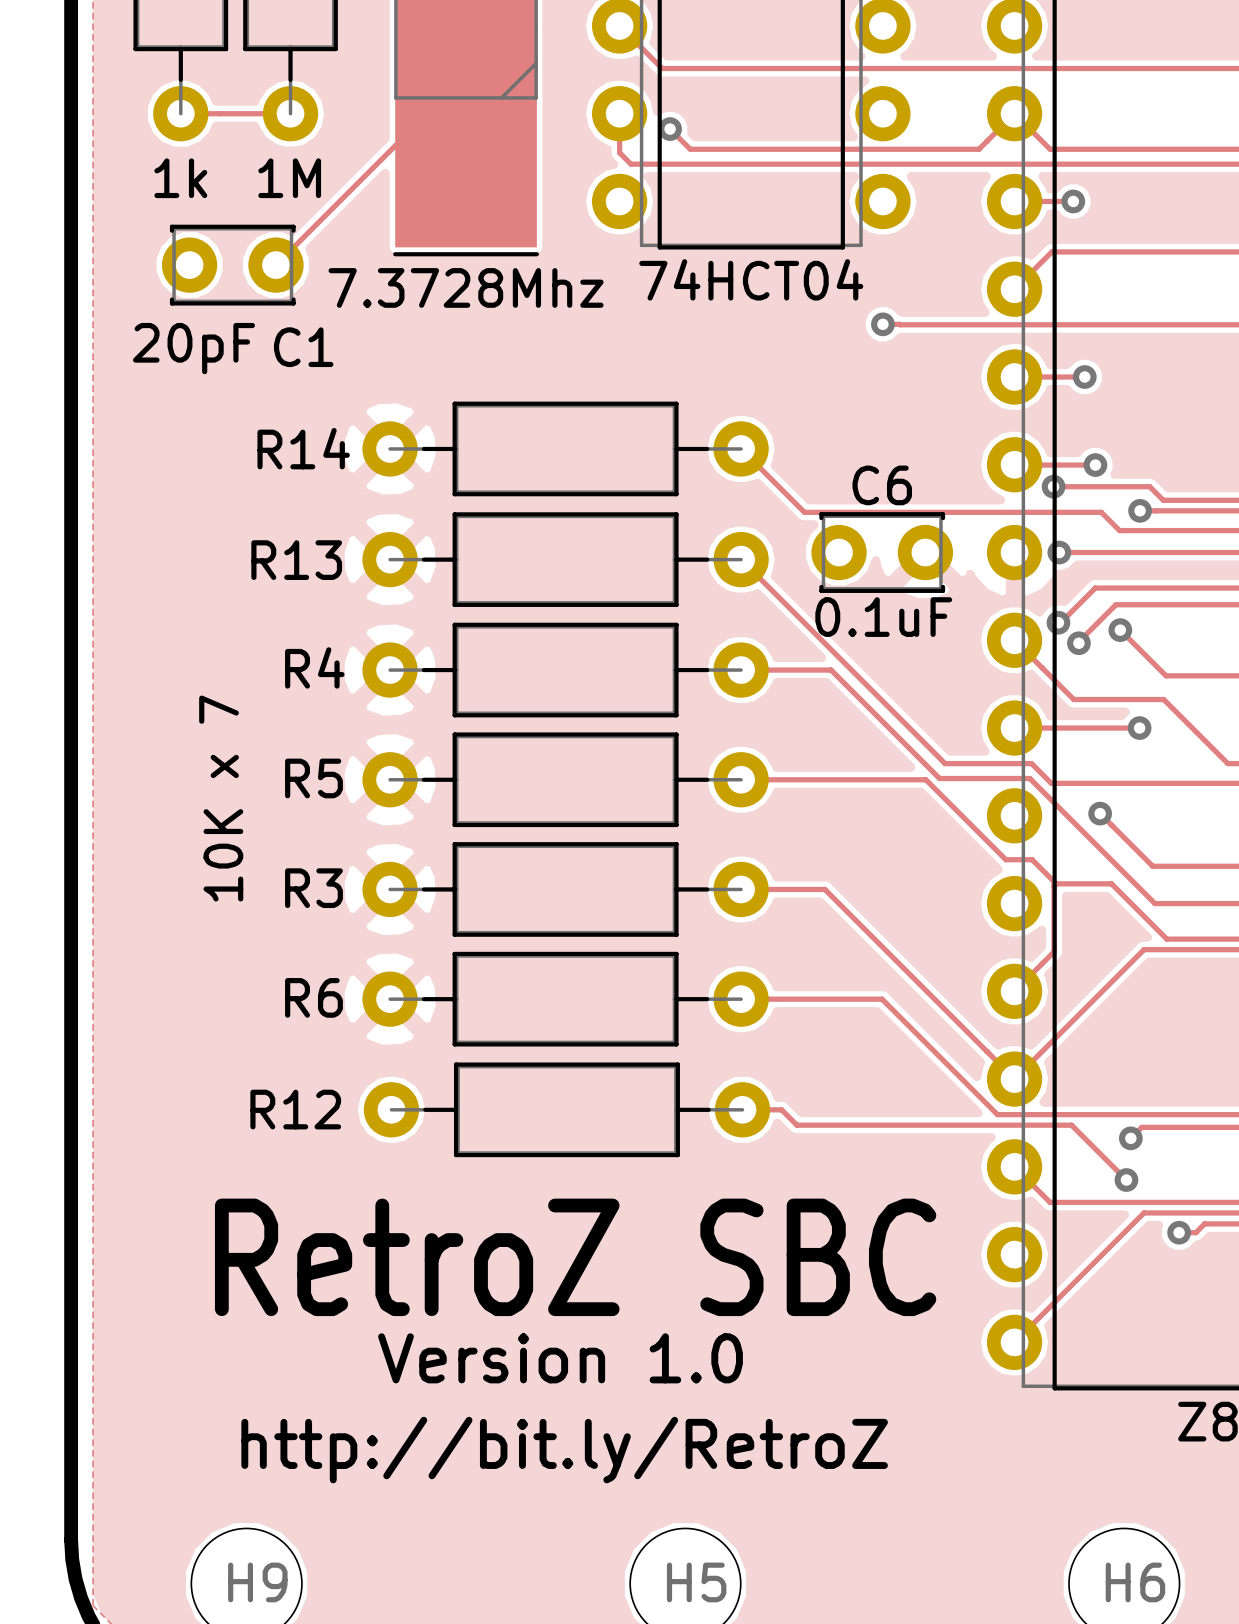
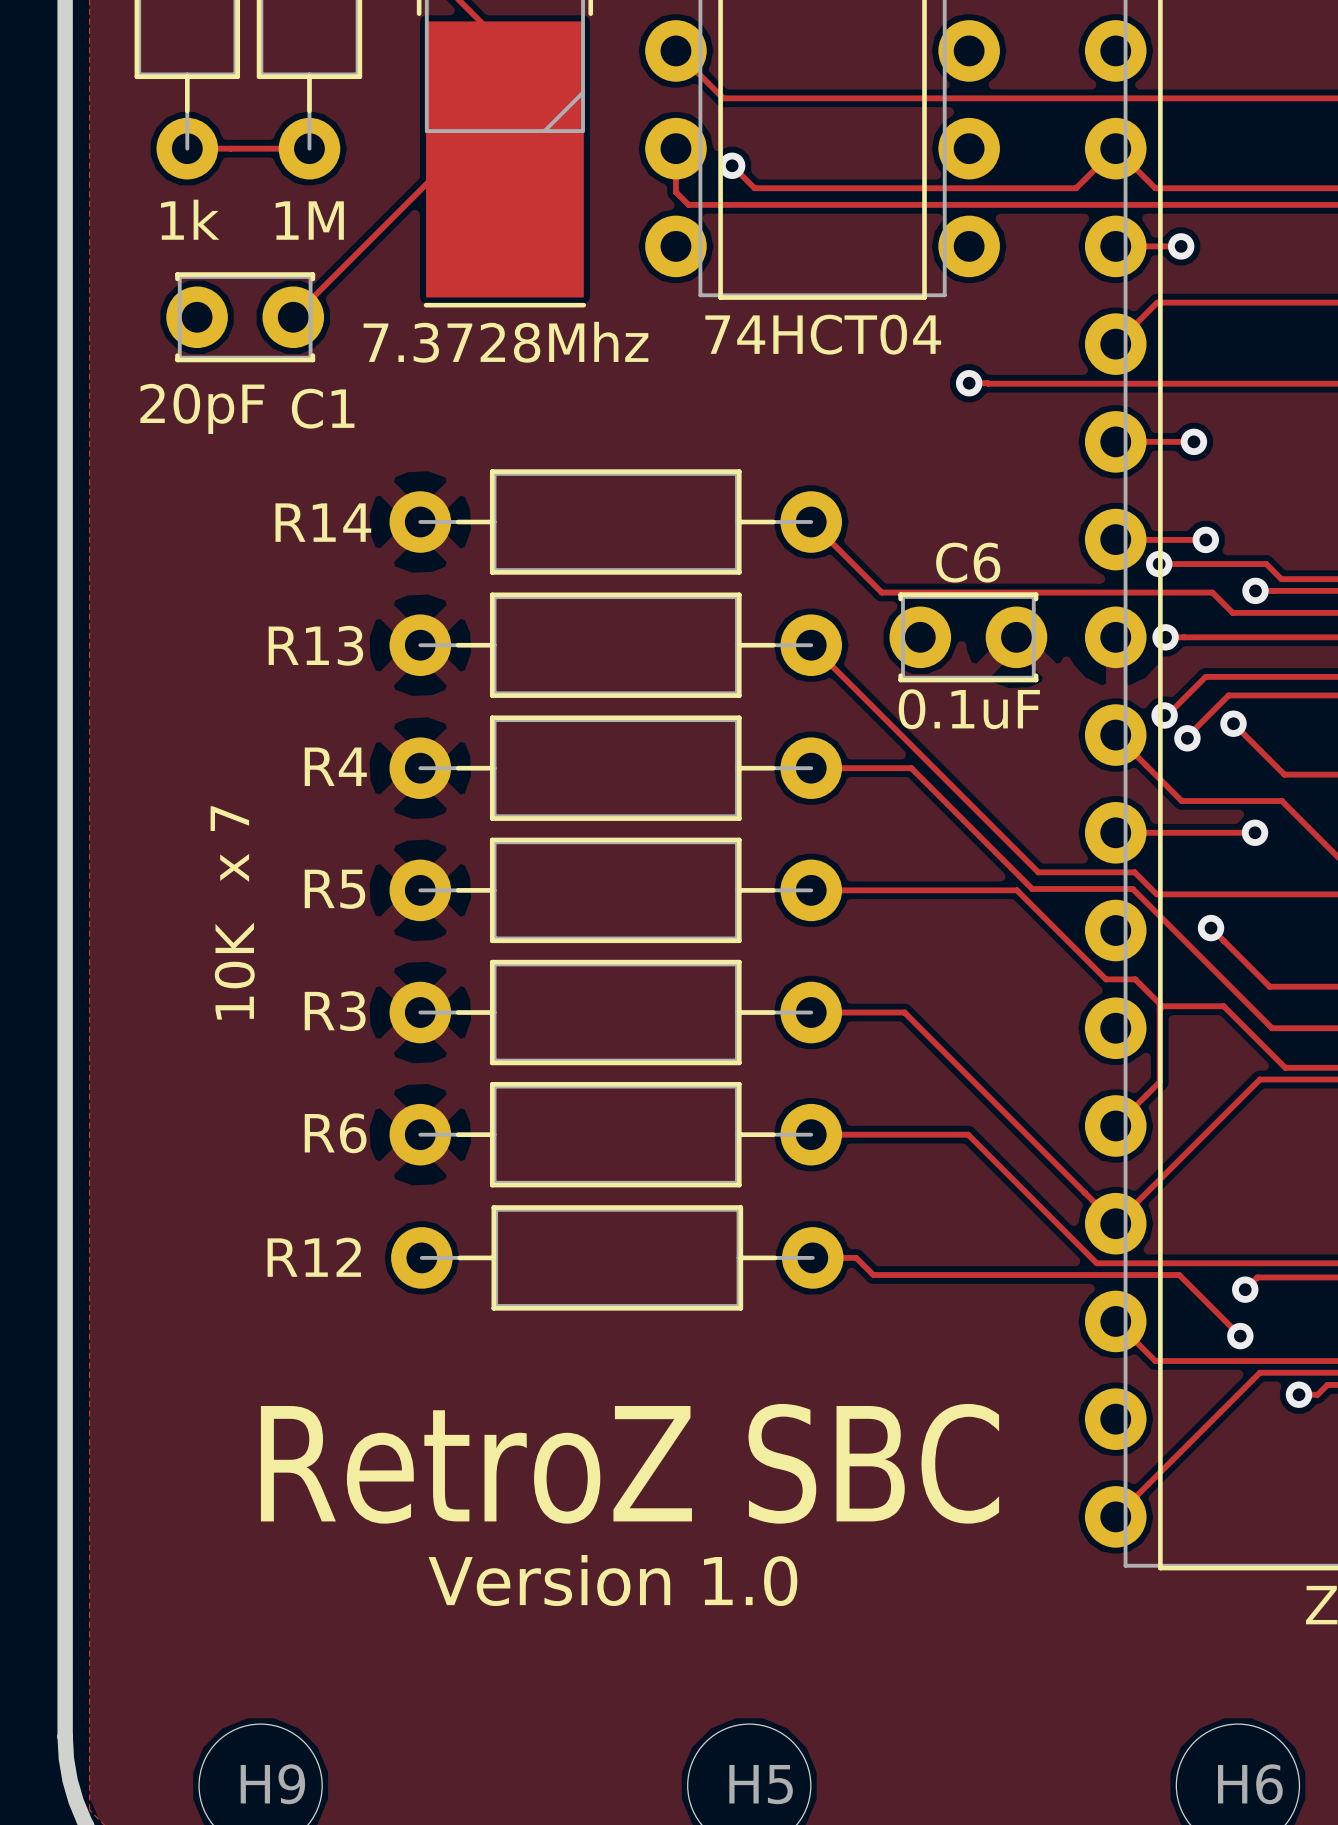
text position: RetroZ SBC (575, 1257) -> RetroZ SBC (629, 1463)
text position: Version 1.0 (560, 1358) -> Version 1.0 (612, 1580)
text: http://bit.ly/RetroZ (564, 1450) -> none

